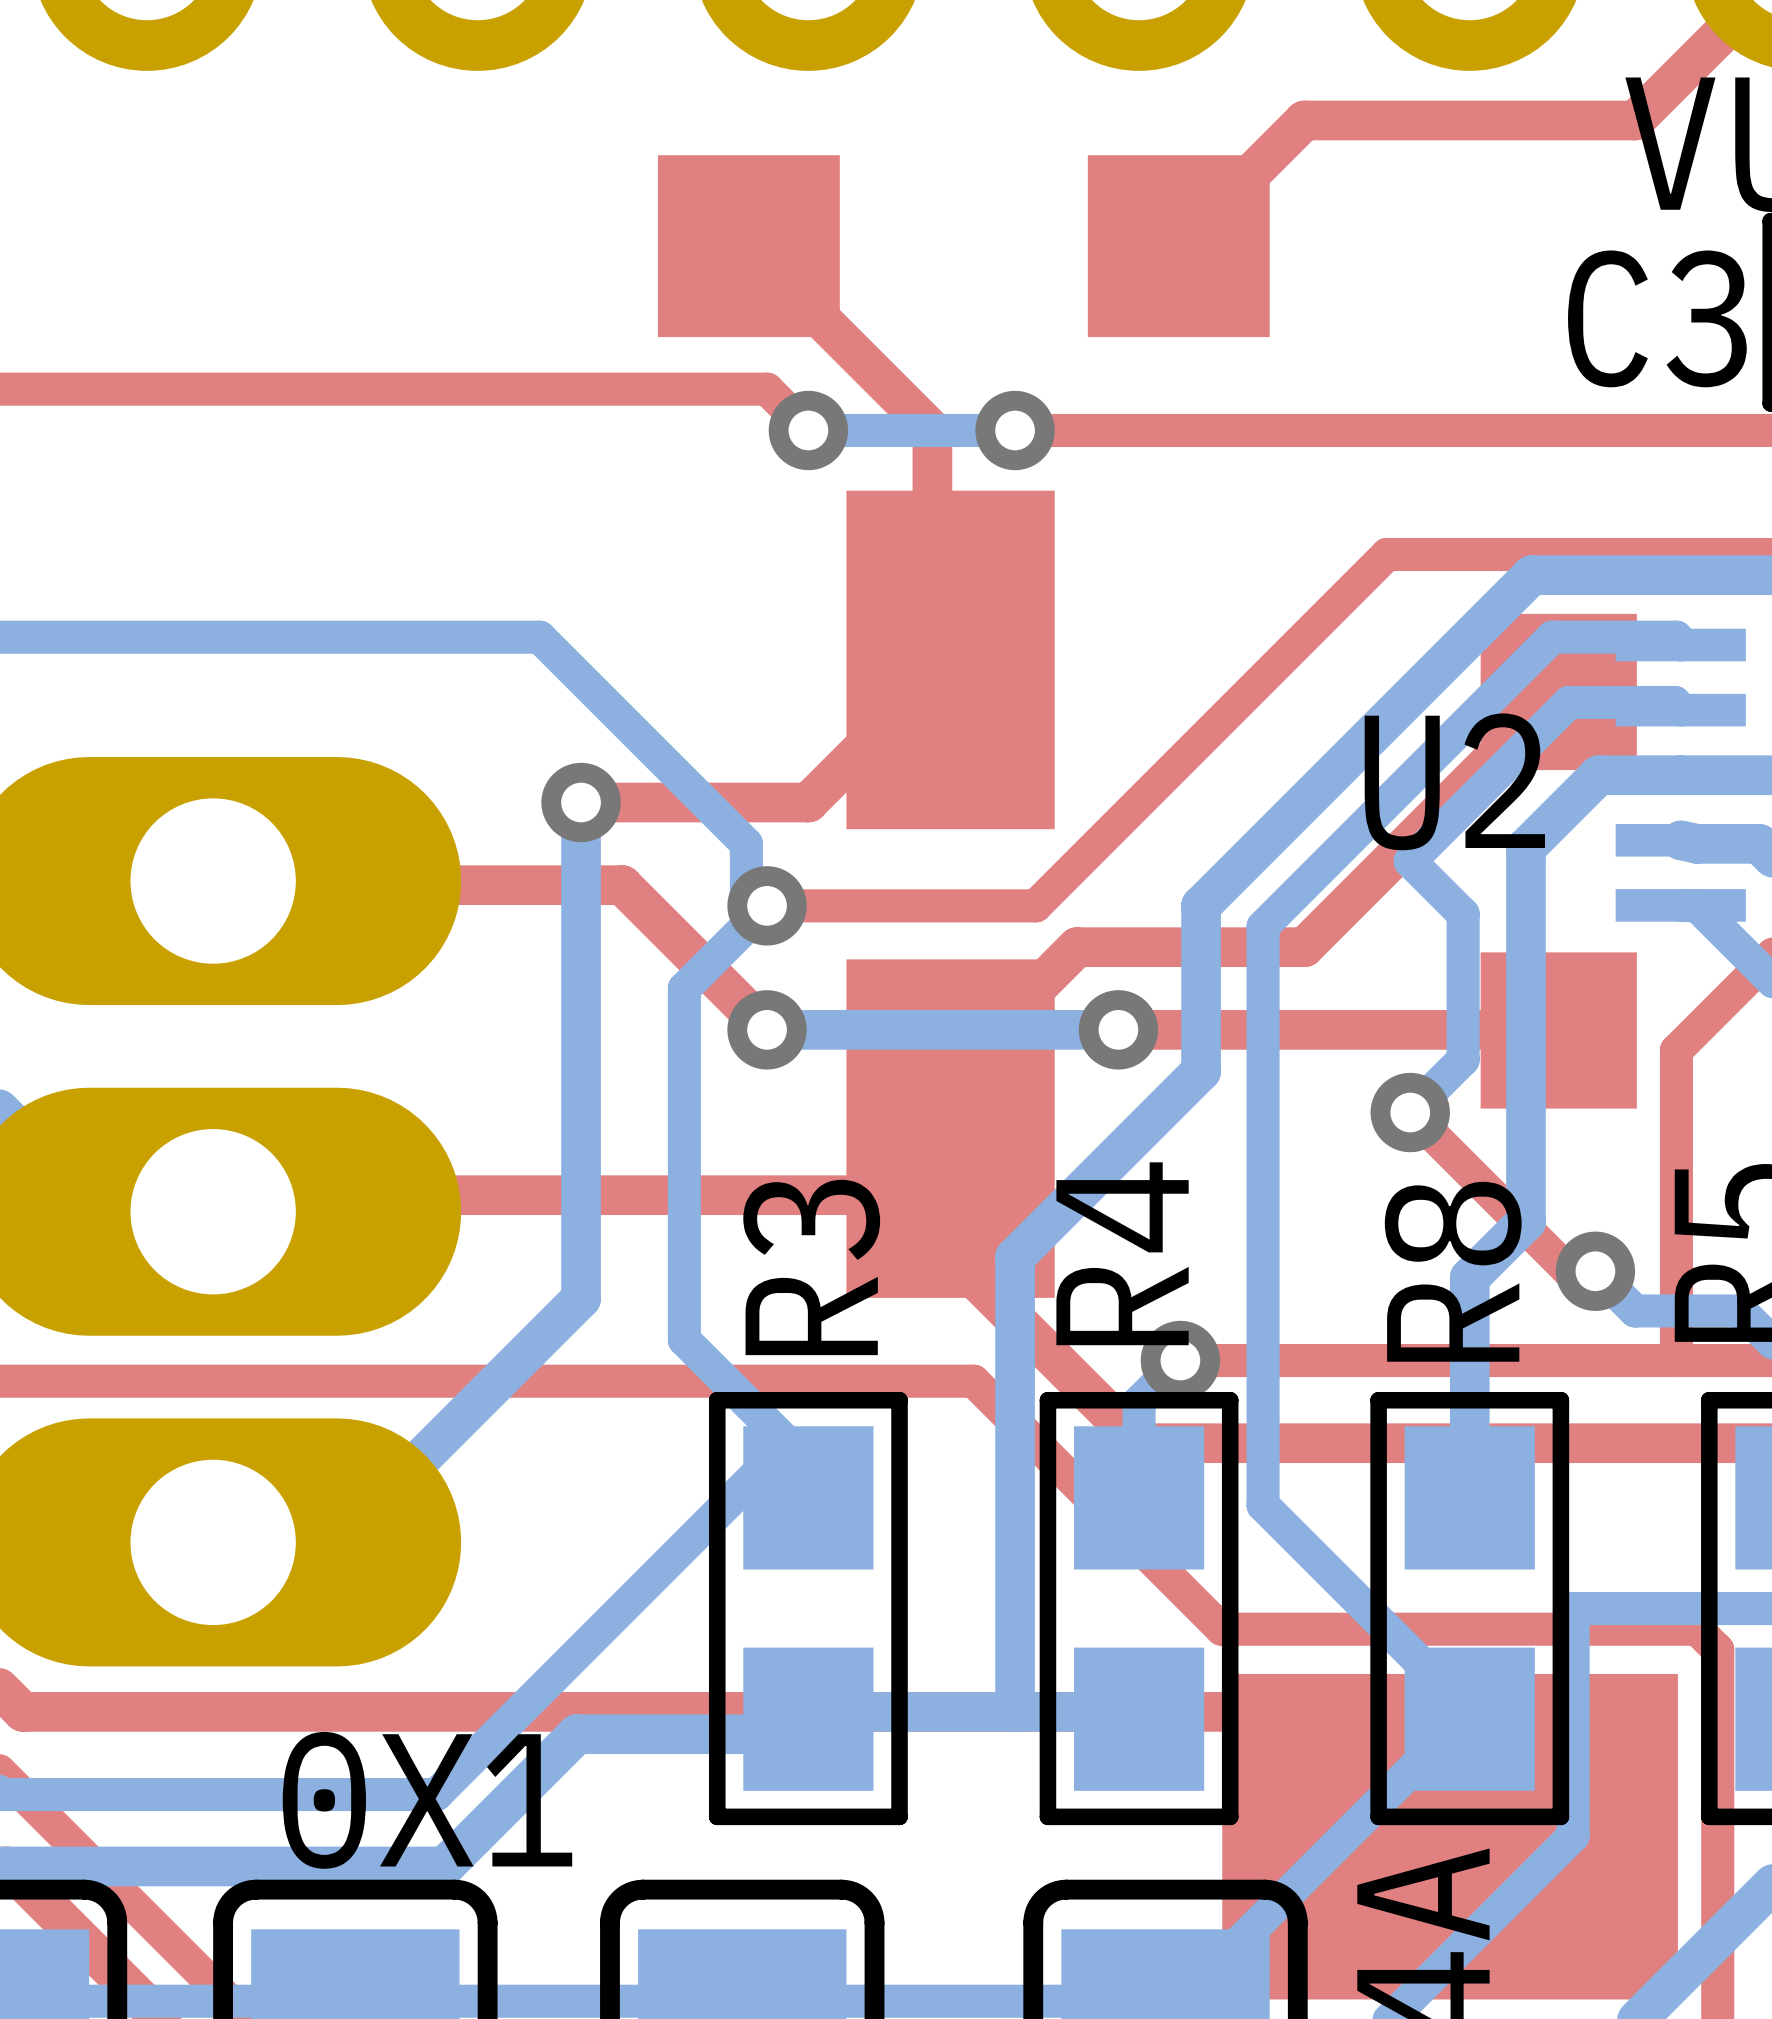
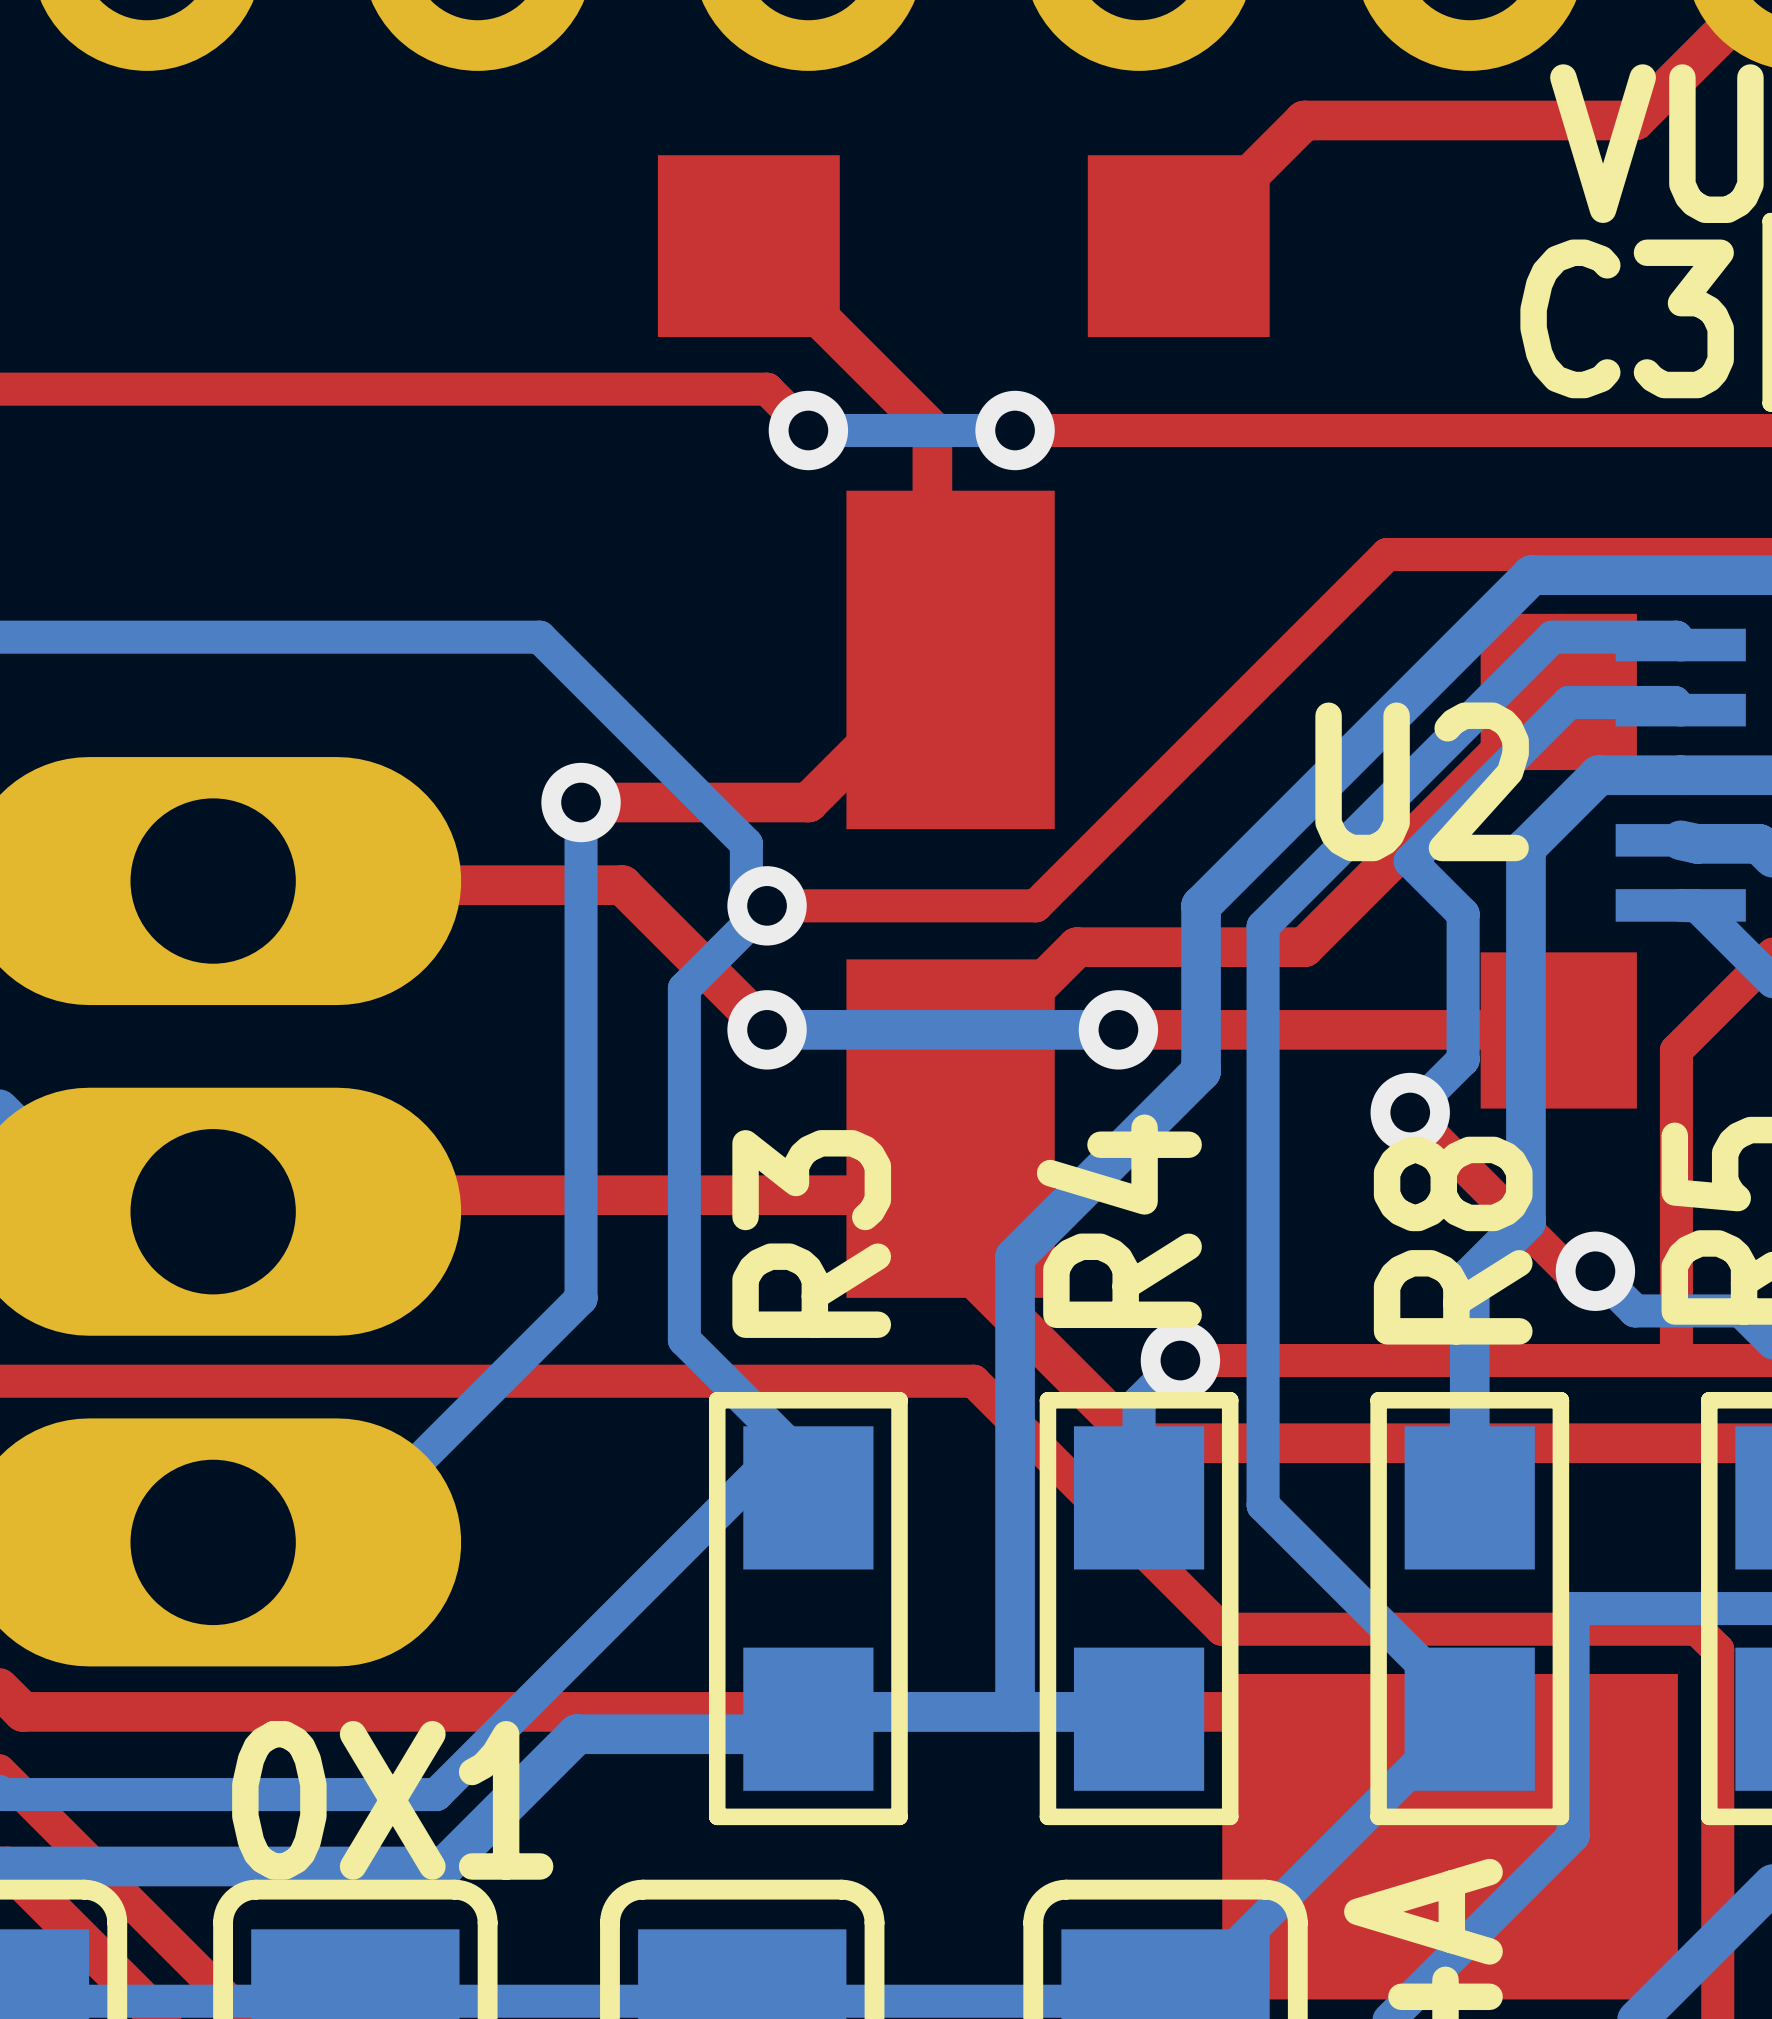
bottom track width: thick (581, 802) (581, 1298) (353, 1525) (229, 1525) (213, 1542) -> thin (581, 802) (581, 1298) (353, 1525) (229, 1525) (213, 1542)

